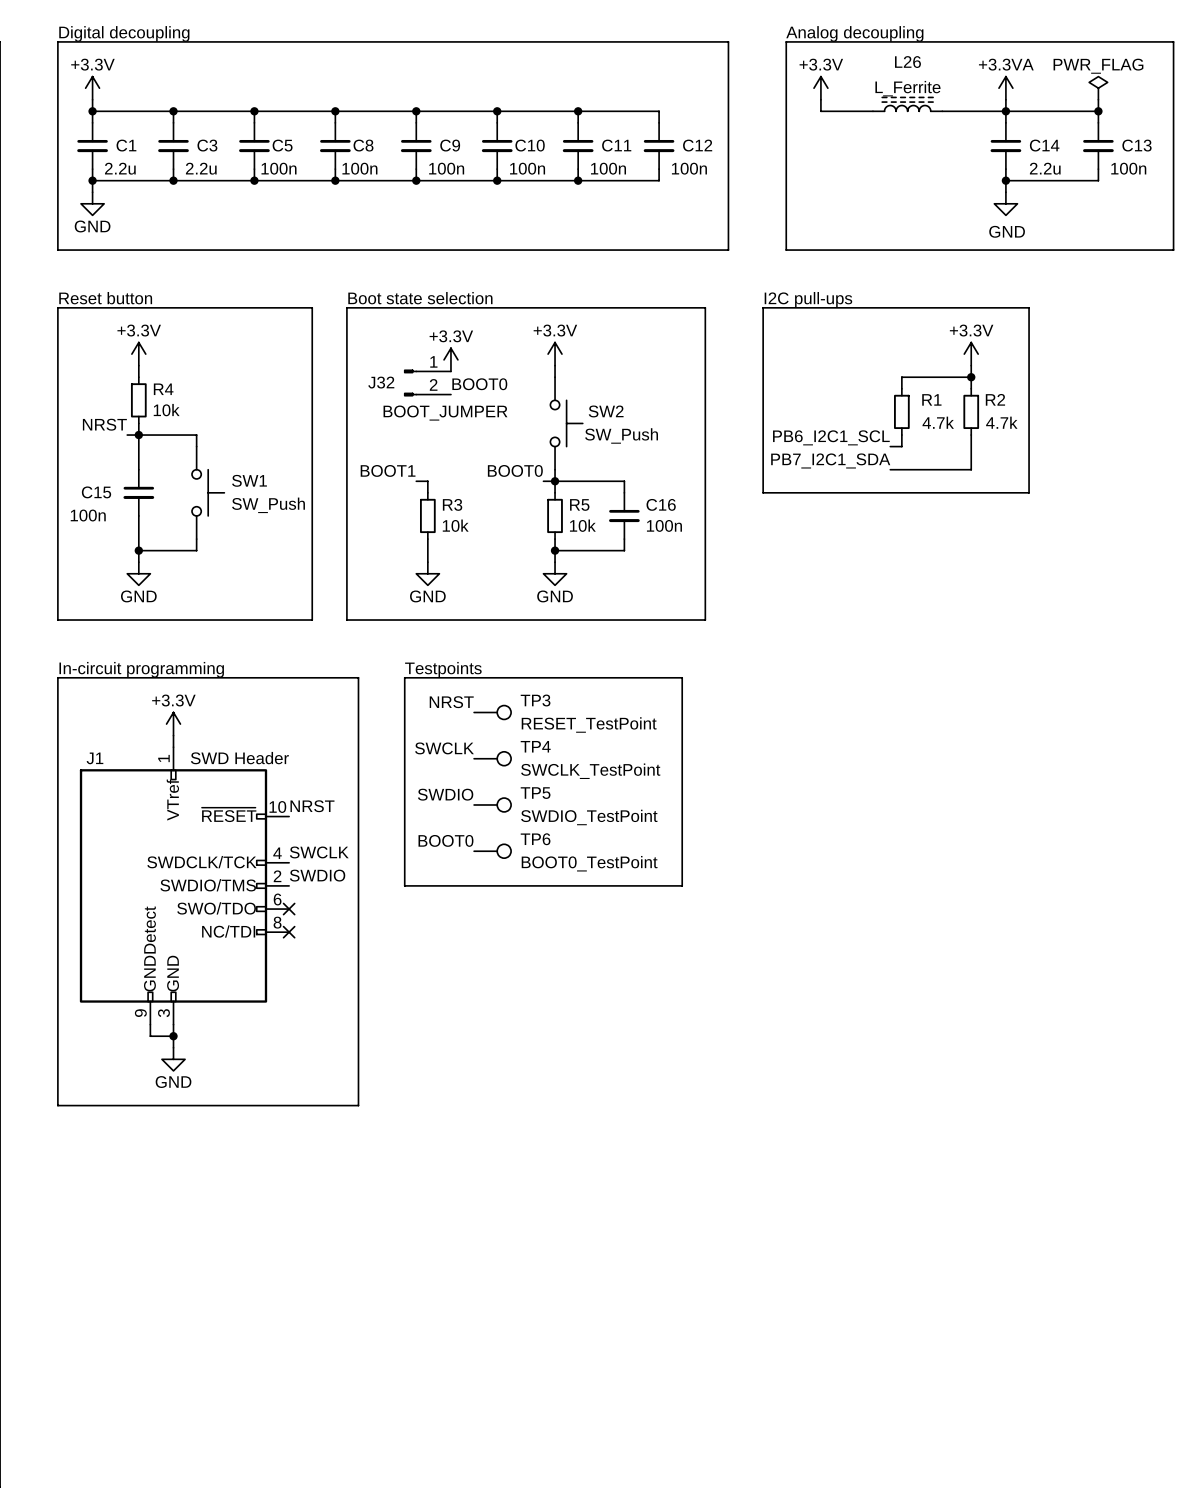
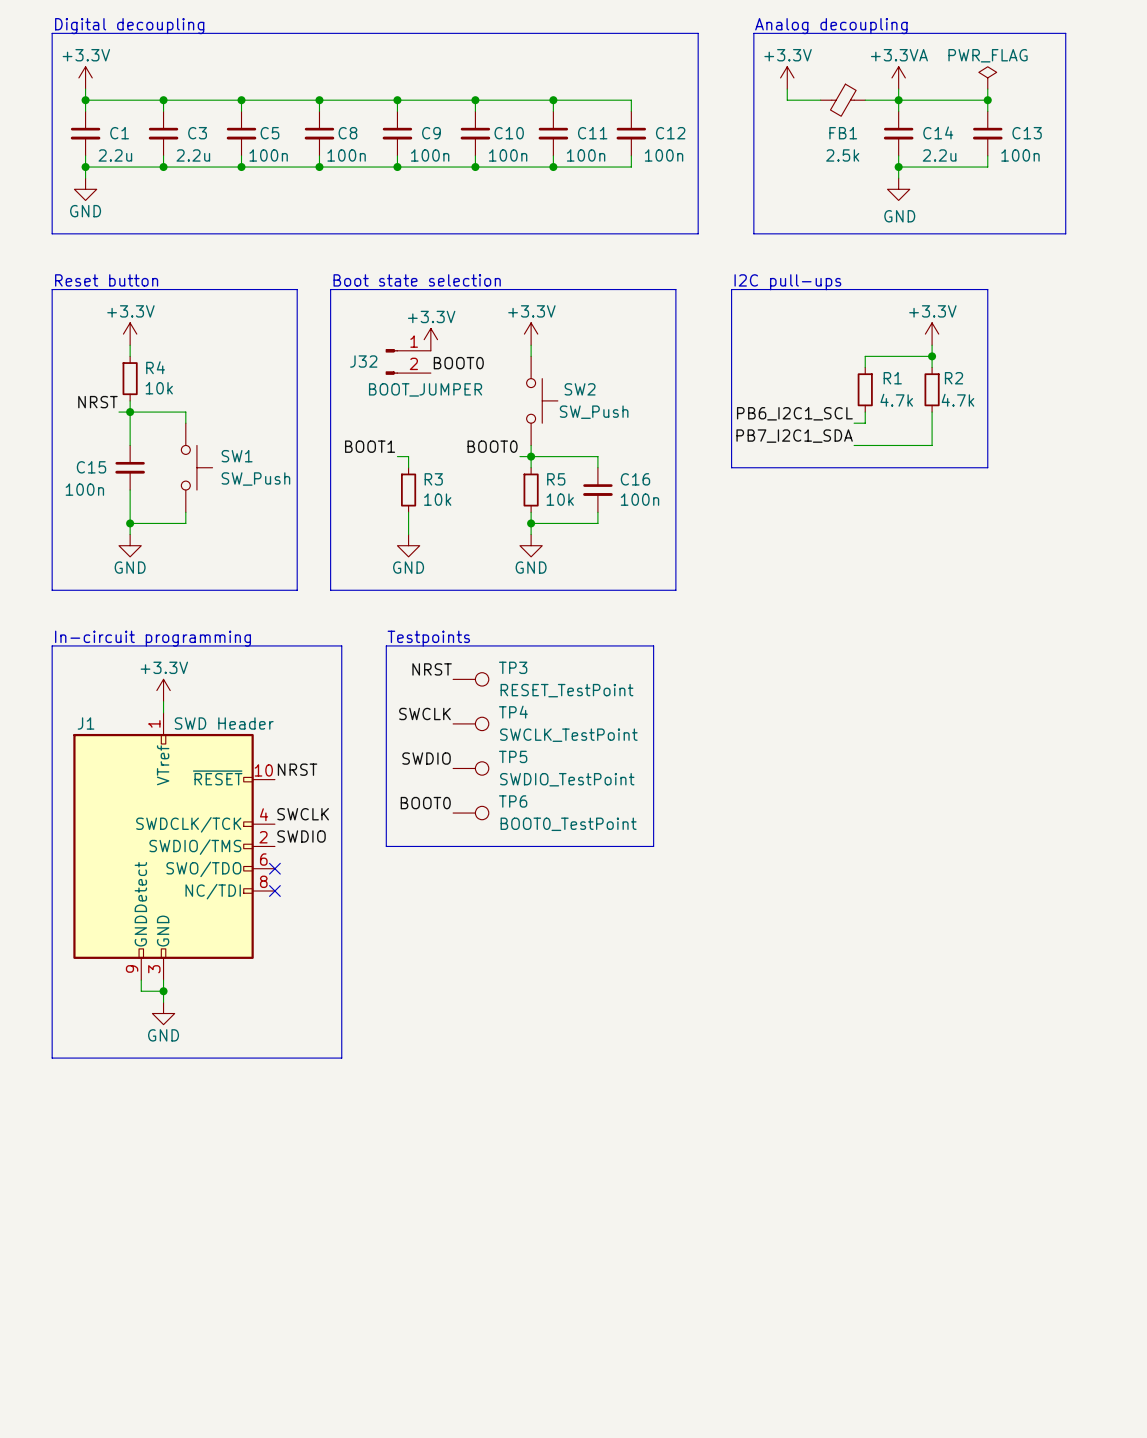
line: (1109, 41) (1173, 41) (1173, 250) (1109, 250) -> (1065, 33) (1065, 233)
power symbol position: +3.3VA (1005, 88) -> +3.3VA (898, 77)
power symbol position: PWR_FLAG (1098, 88) -> PWR_FLAG (987, 77)
wire: (1005, 99) (1005, 122) -> (898, 89) (898, 111)
wire: (1098, 99) (1098, 122) -> (987, 89) (987, 111)
L26: L_Ferrite (907, 104) -> none
FB1: none -> 2.5k (842, 100)
wire: none -> (865, 100) (904, 100)
junction: none -> (898, 100)
junction position: (1005, 111) -> (987, 100)
wire: (1029, 111) (1098, 111) -> (898, 167) (965, 167)
junction: (1098, 111) -> none
C14 position: (1005, 145) -> (898, 133)
C13 position: (1098, 145) -> (987, 133)
wire: (1005, 169) (1005, 192) -> (898, 155) (898, 178)
wire: (1098, 169) (1098, 180) (1029, 180) -> (987, 155) (987, 167)
junction: none -> (898, 167)
junction: (1005, 180) -> none
power symbol position: GND (1005, 203) -> GND (898, 189)

